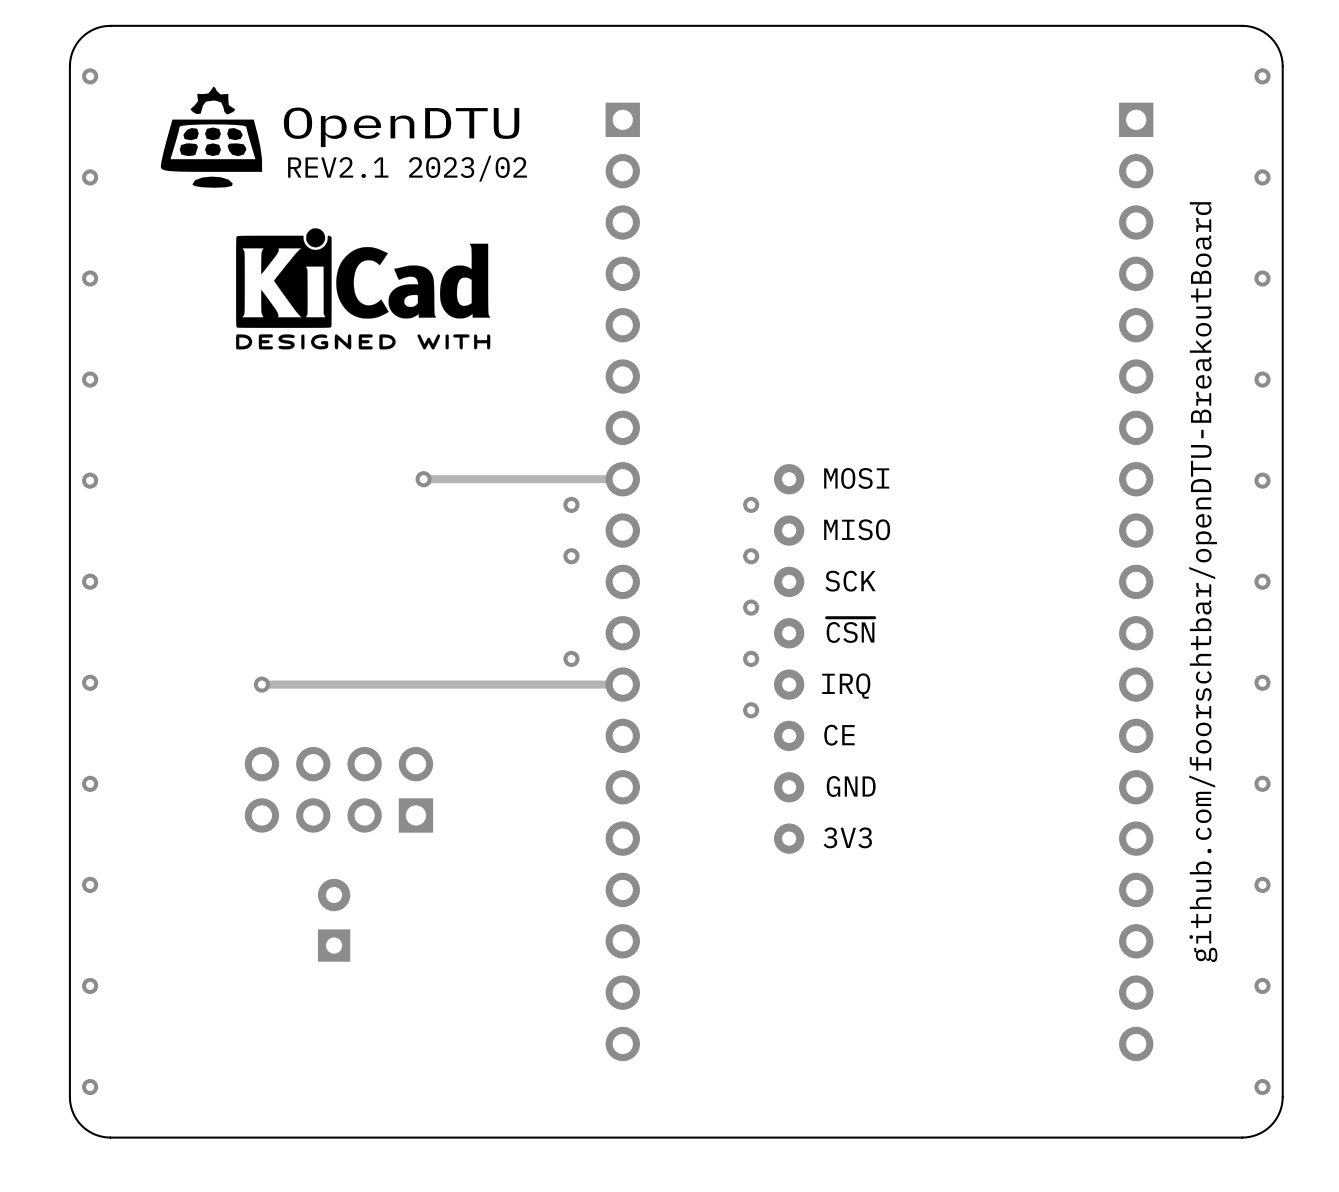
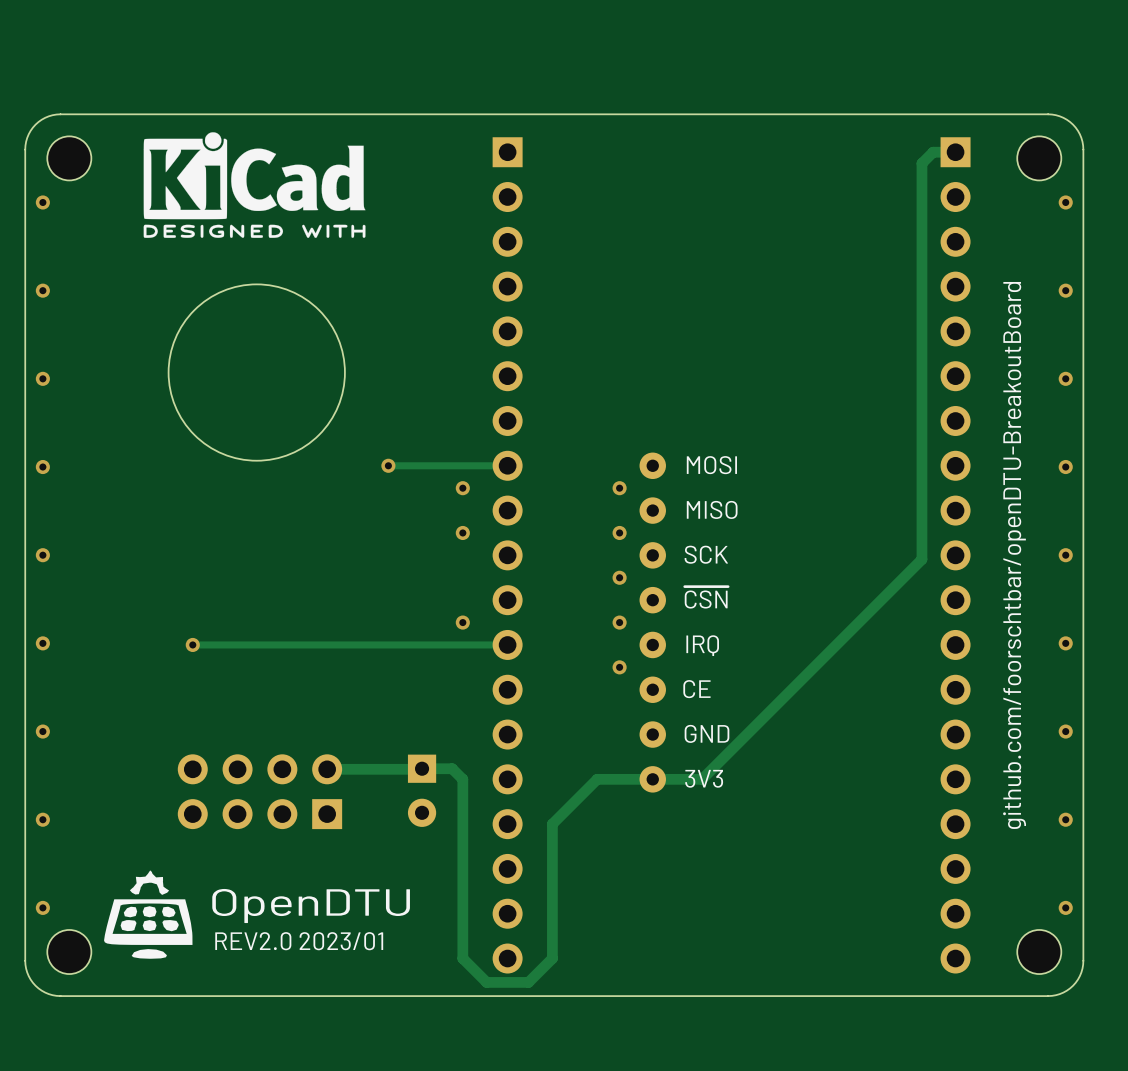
via: (90, 76) -> none
via: (1262, 76) -> none
drawing: [160, 86, 263, 188] -> none
board edge: (1282, 116) (1282, 61) (1278, 48) (1270, 37) (1263, 32) (1255, 28) (1242, 25) (105, 26) (96, 28) (85, 34) (78, 41) (72, 52) (69, 66) (69, 116) -> (1083, 149) (1079, 134) (1073, 124) (1059, 116) (1048, 114) (60, 114) (45, 117) (35, 124) (27, 137) (25, 149)
track: none -> (955, 152) (933, 152) (921, 163) (921, 559) (702, 779) (597, 779) (552, 824) (552, 958) (528, 982) (486, 982) (462, 958) (462, 779) (452, 768) (327, 769)
part: none -> (69, 158)
part: none -> (1039, 158)
text: OpenDTU (401, 127) -> none
text: REV2.1 2023/02 (407, 168) -> none
round board edge: none -> [167, 283, 346, 462]
drawing position: (363, 288) -> (254, 185)
via position: (423, 479) -> (388, 465)
track: (486, 479) (423, 479) -> none
part position: (338, 789) -> (259, 791)
part rotation: 0° (334, 920) -> 180° (422, 790)
part position: (334, 920) -> (422, 790)
drawing: none -> [104, 870, 193, 959]
text: none -> OpenDTU (311, 906)
text: none -> REV2.0 2023/01 (299, 941)
part: none -> (69, 951)
part: none -> (1039, 951)
board edge: (1282, 1046) (1282, 1101) (1278, 1114) (1273, 1122) (1263, 1131) (1251, 1136) (1242, 1137) (105, 1137) (92, 1133) (85, 1128) (78, 1122) (72, 1110) (69, 1097) (69, 1046) -> (1083, 960) (1081, 972) (1073, 985) (1063, 992) (1048, 996) (60, 996) (48, 994) (35, 985) (27, 972) (25, 960)
via: (90, 1087) -> none
via: (1262, 1087) -> none

